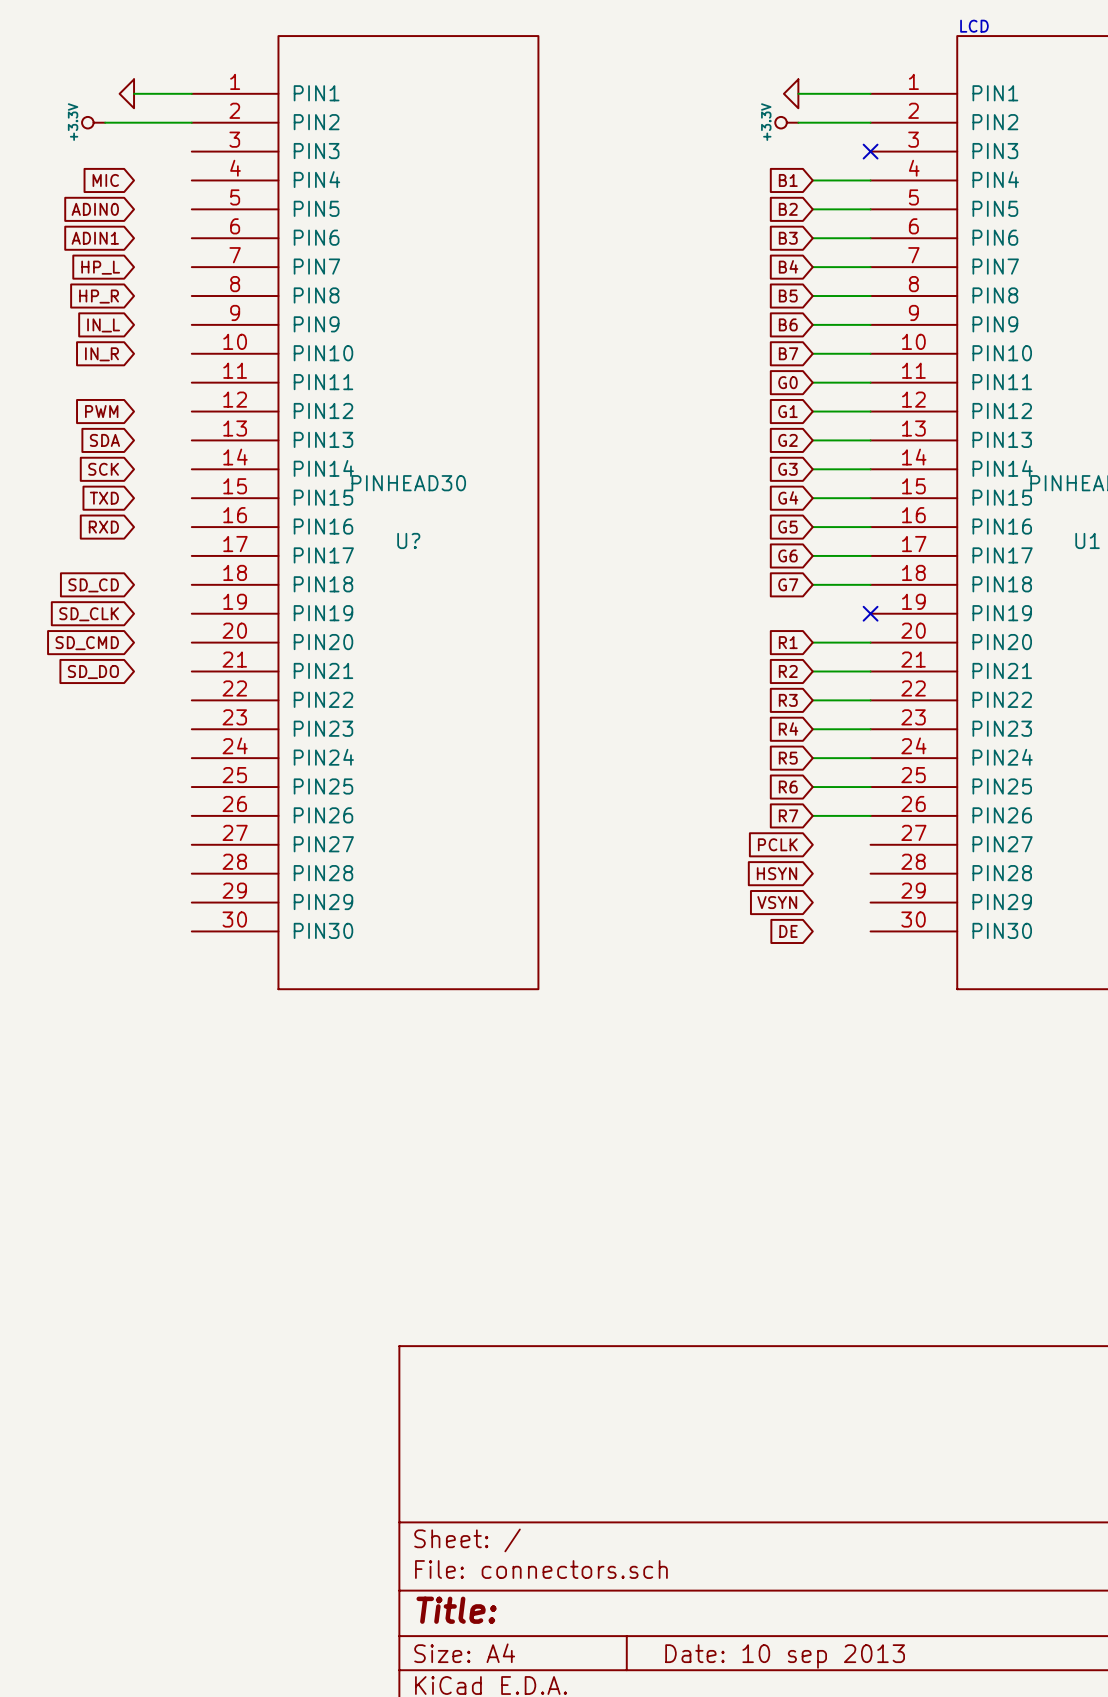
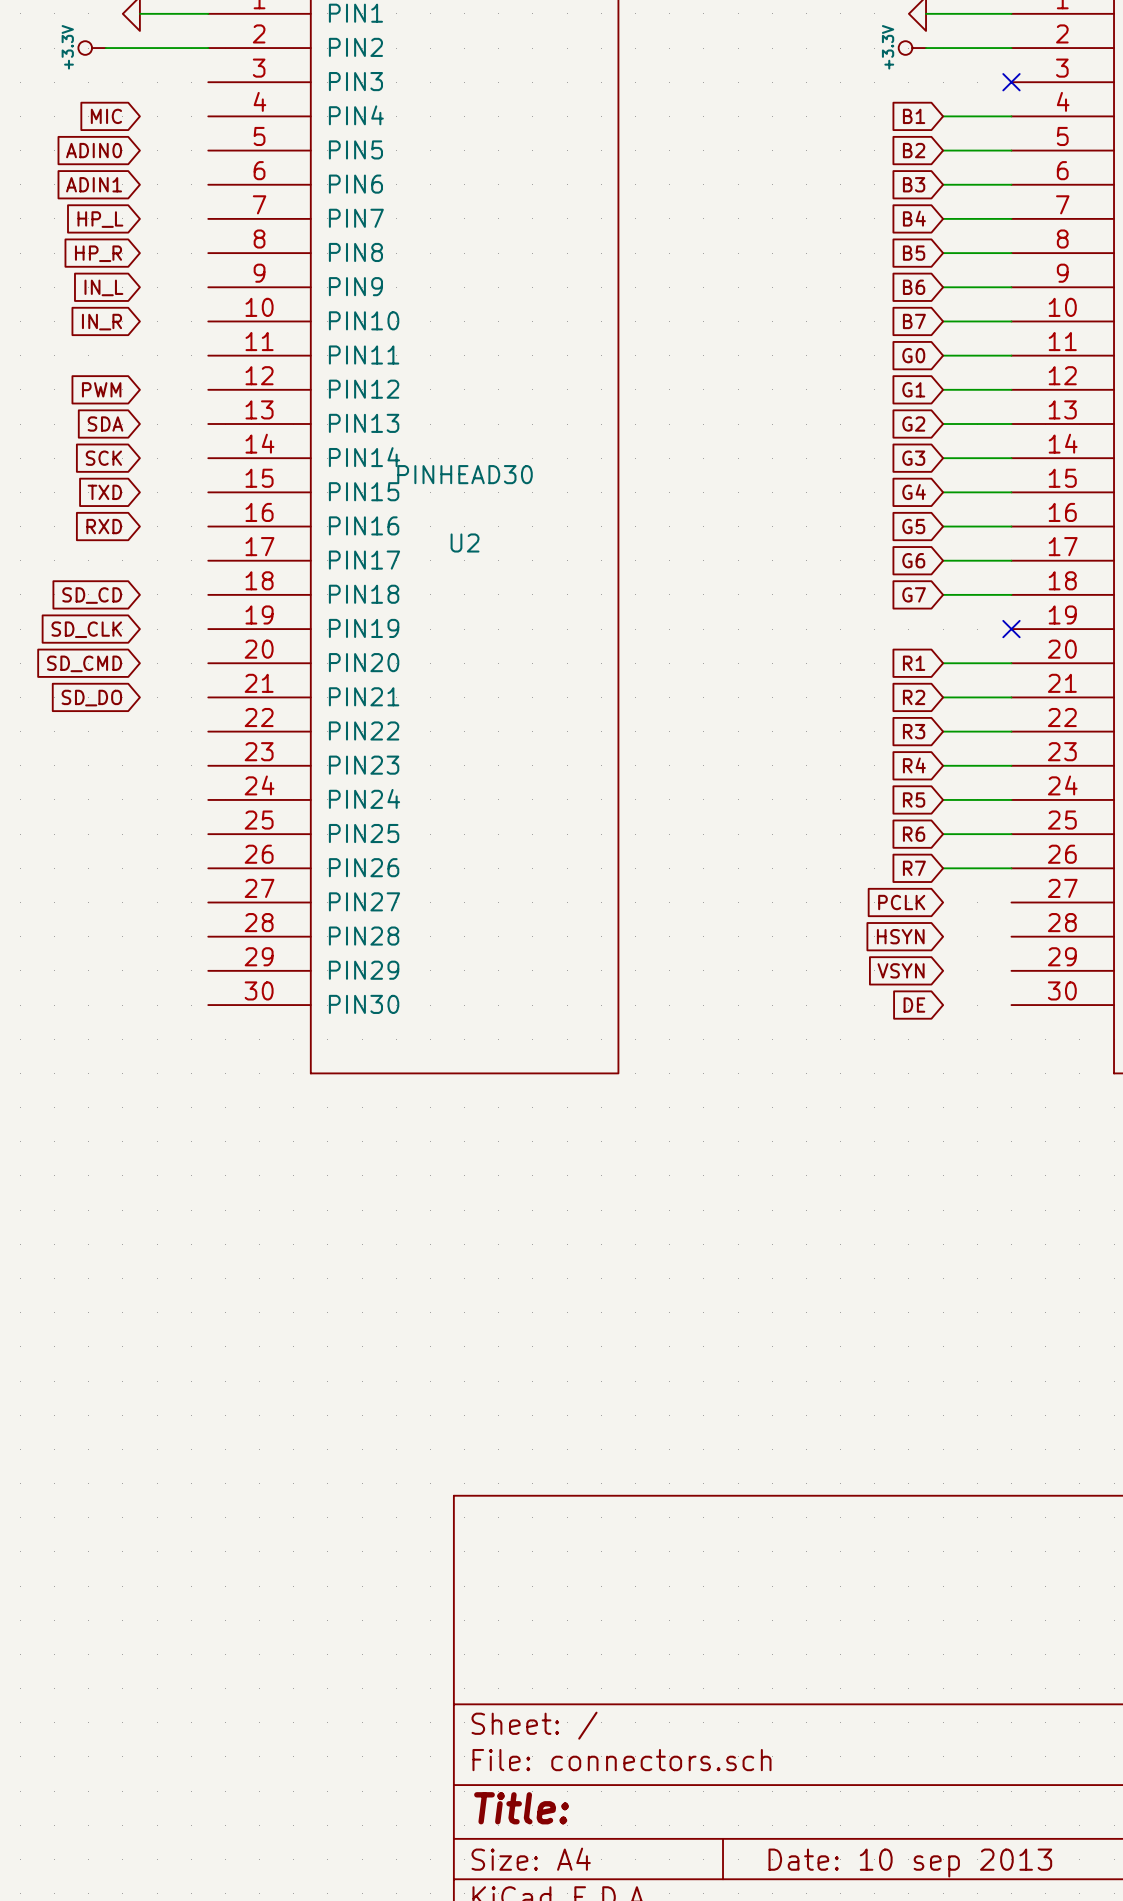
U? name: U? (408, 540) -> U2 (465, 542)

